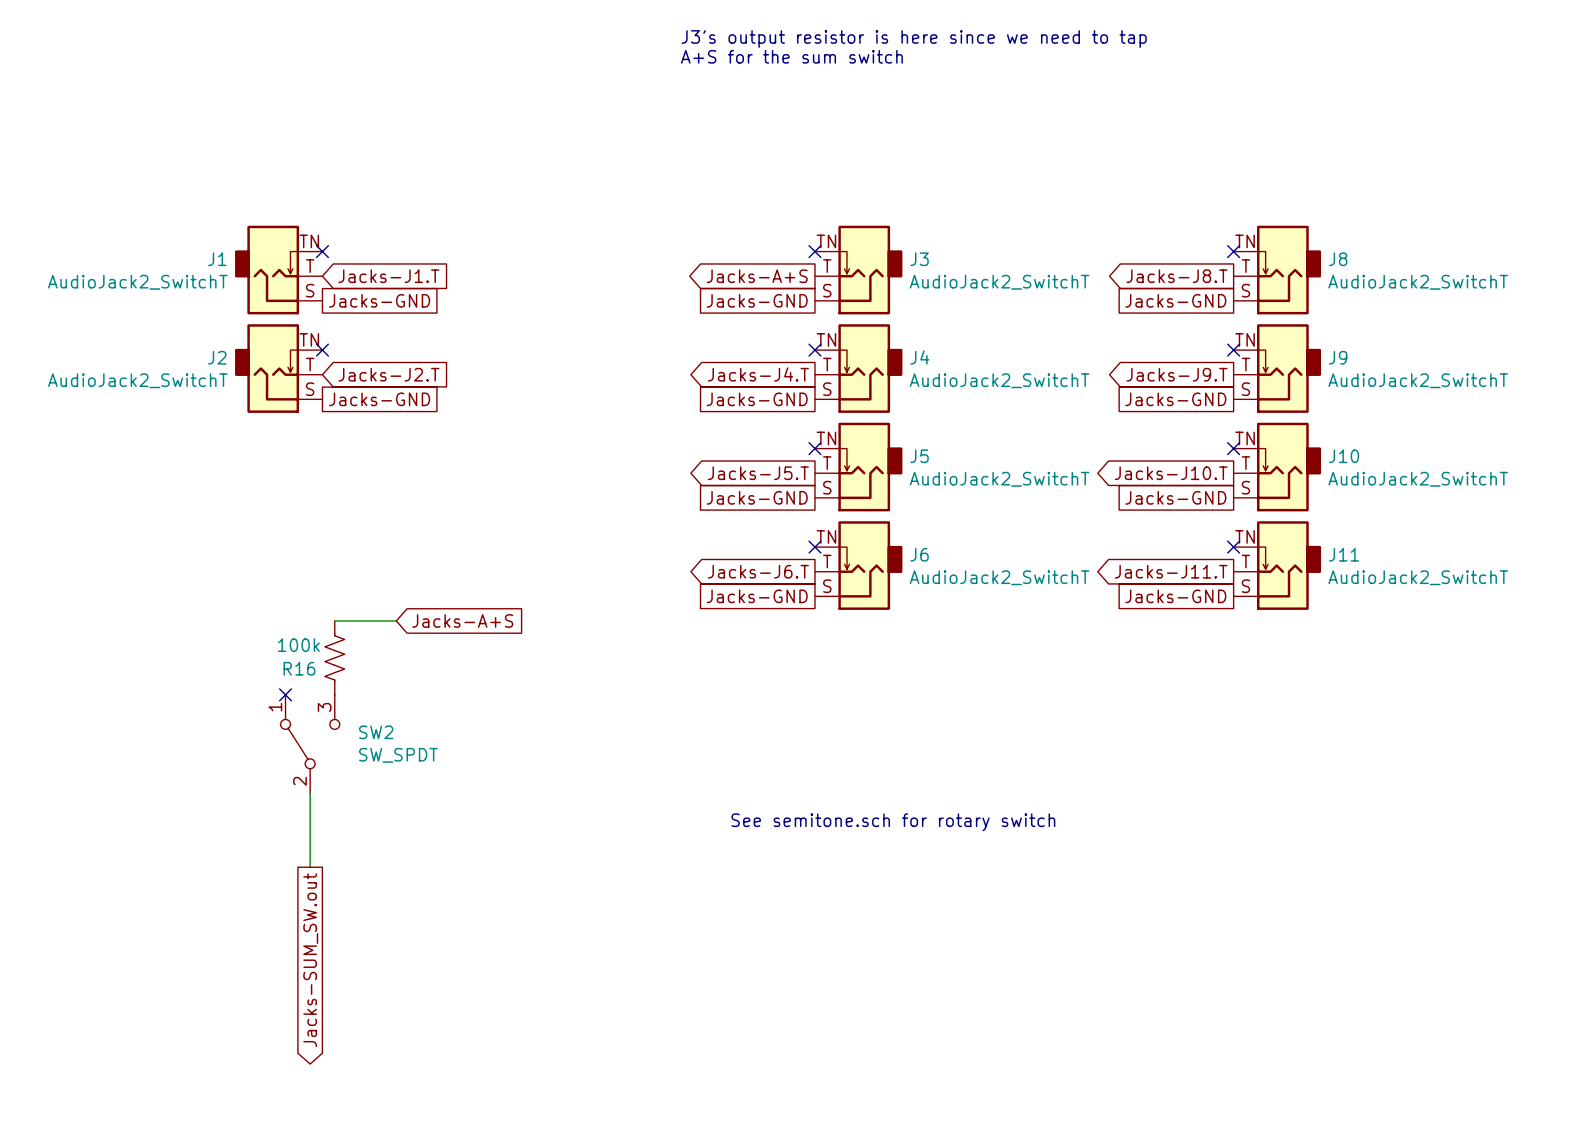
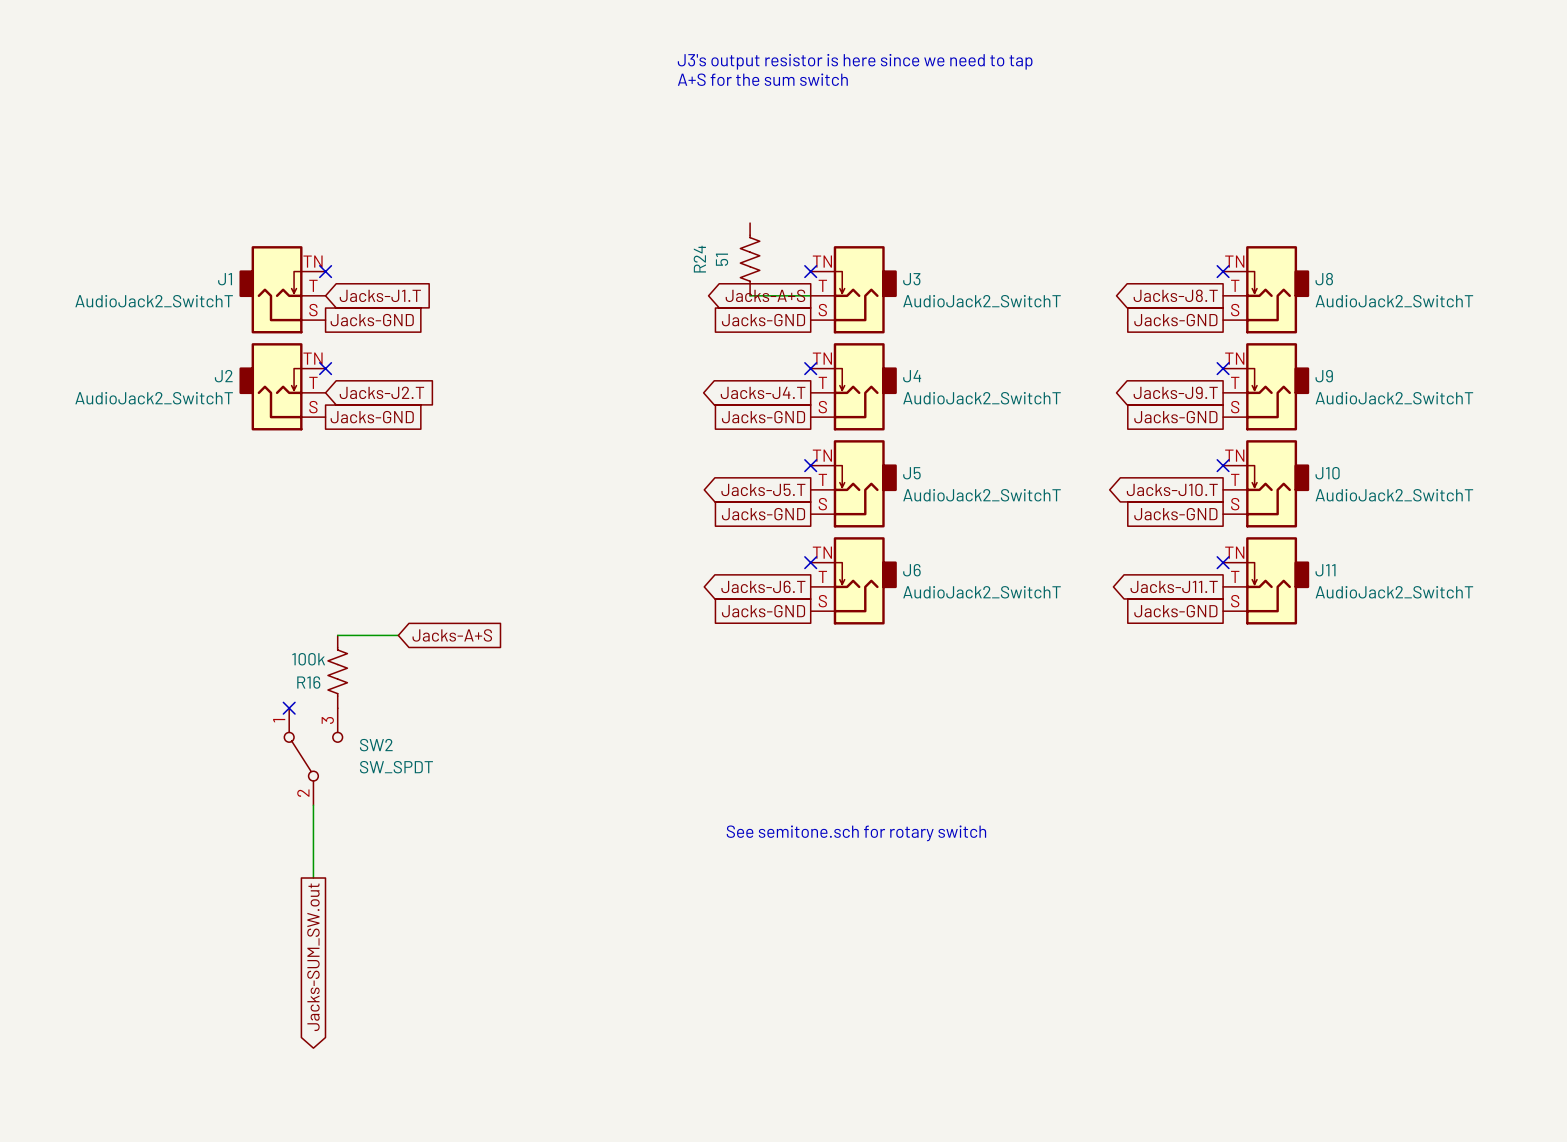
R24: none -> 51 (750, 259)
wire: none -> (750, 295) (810, 295)

